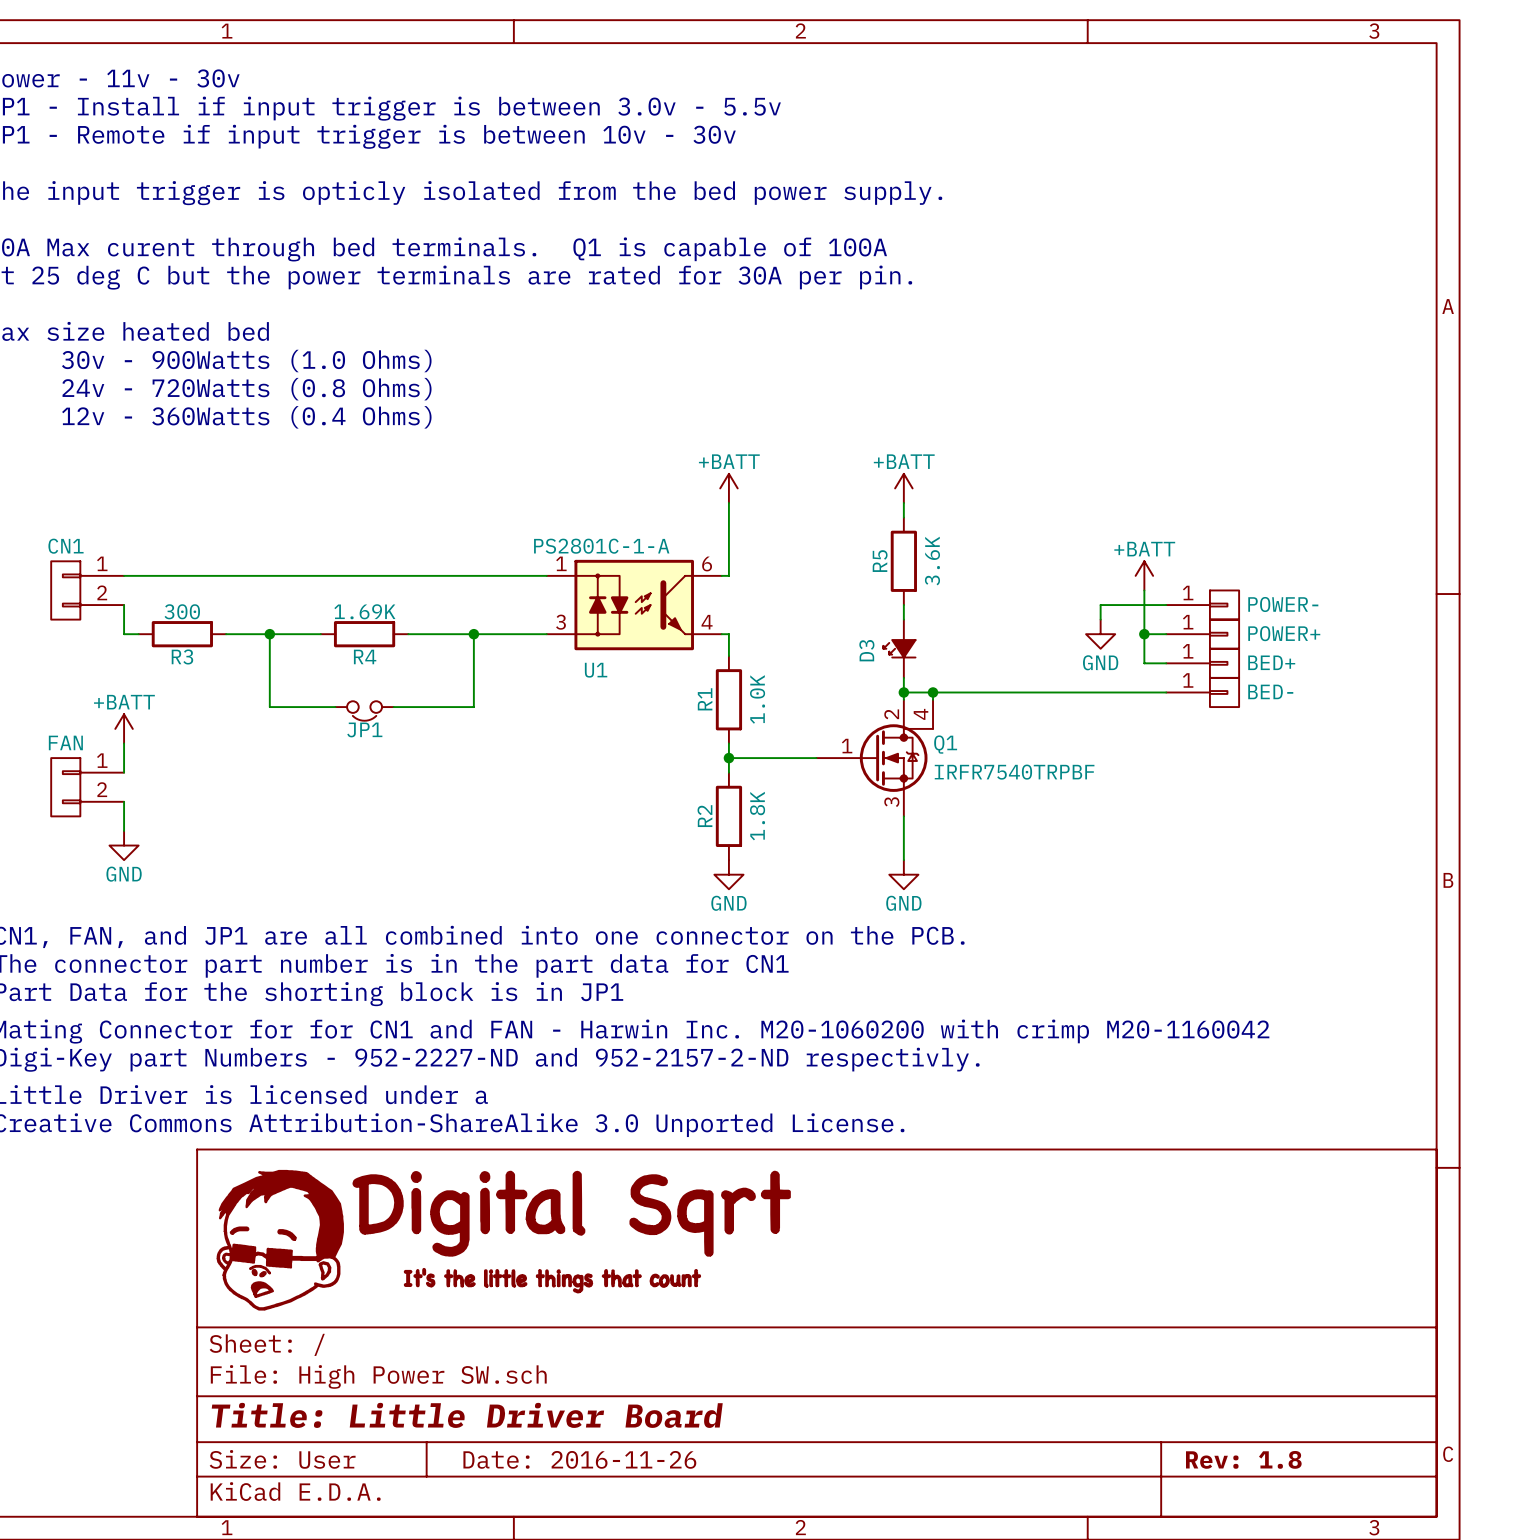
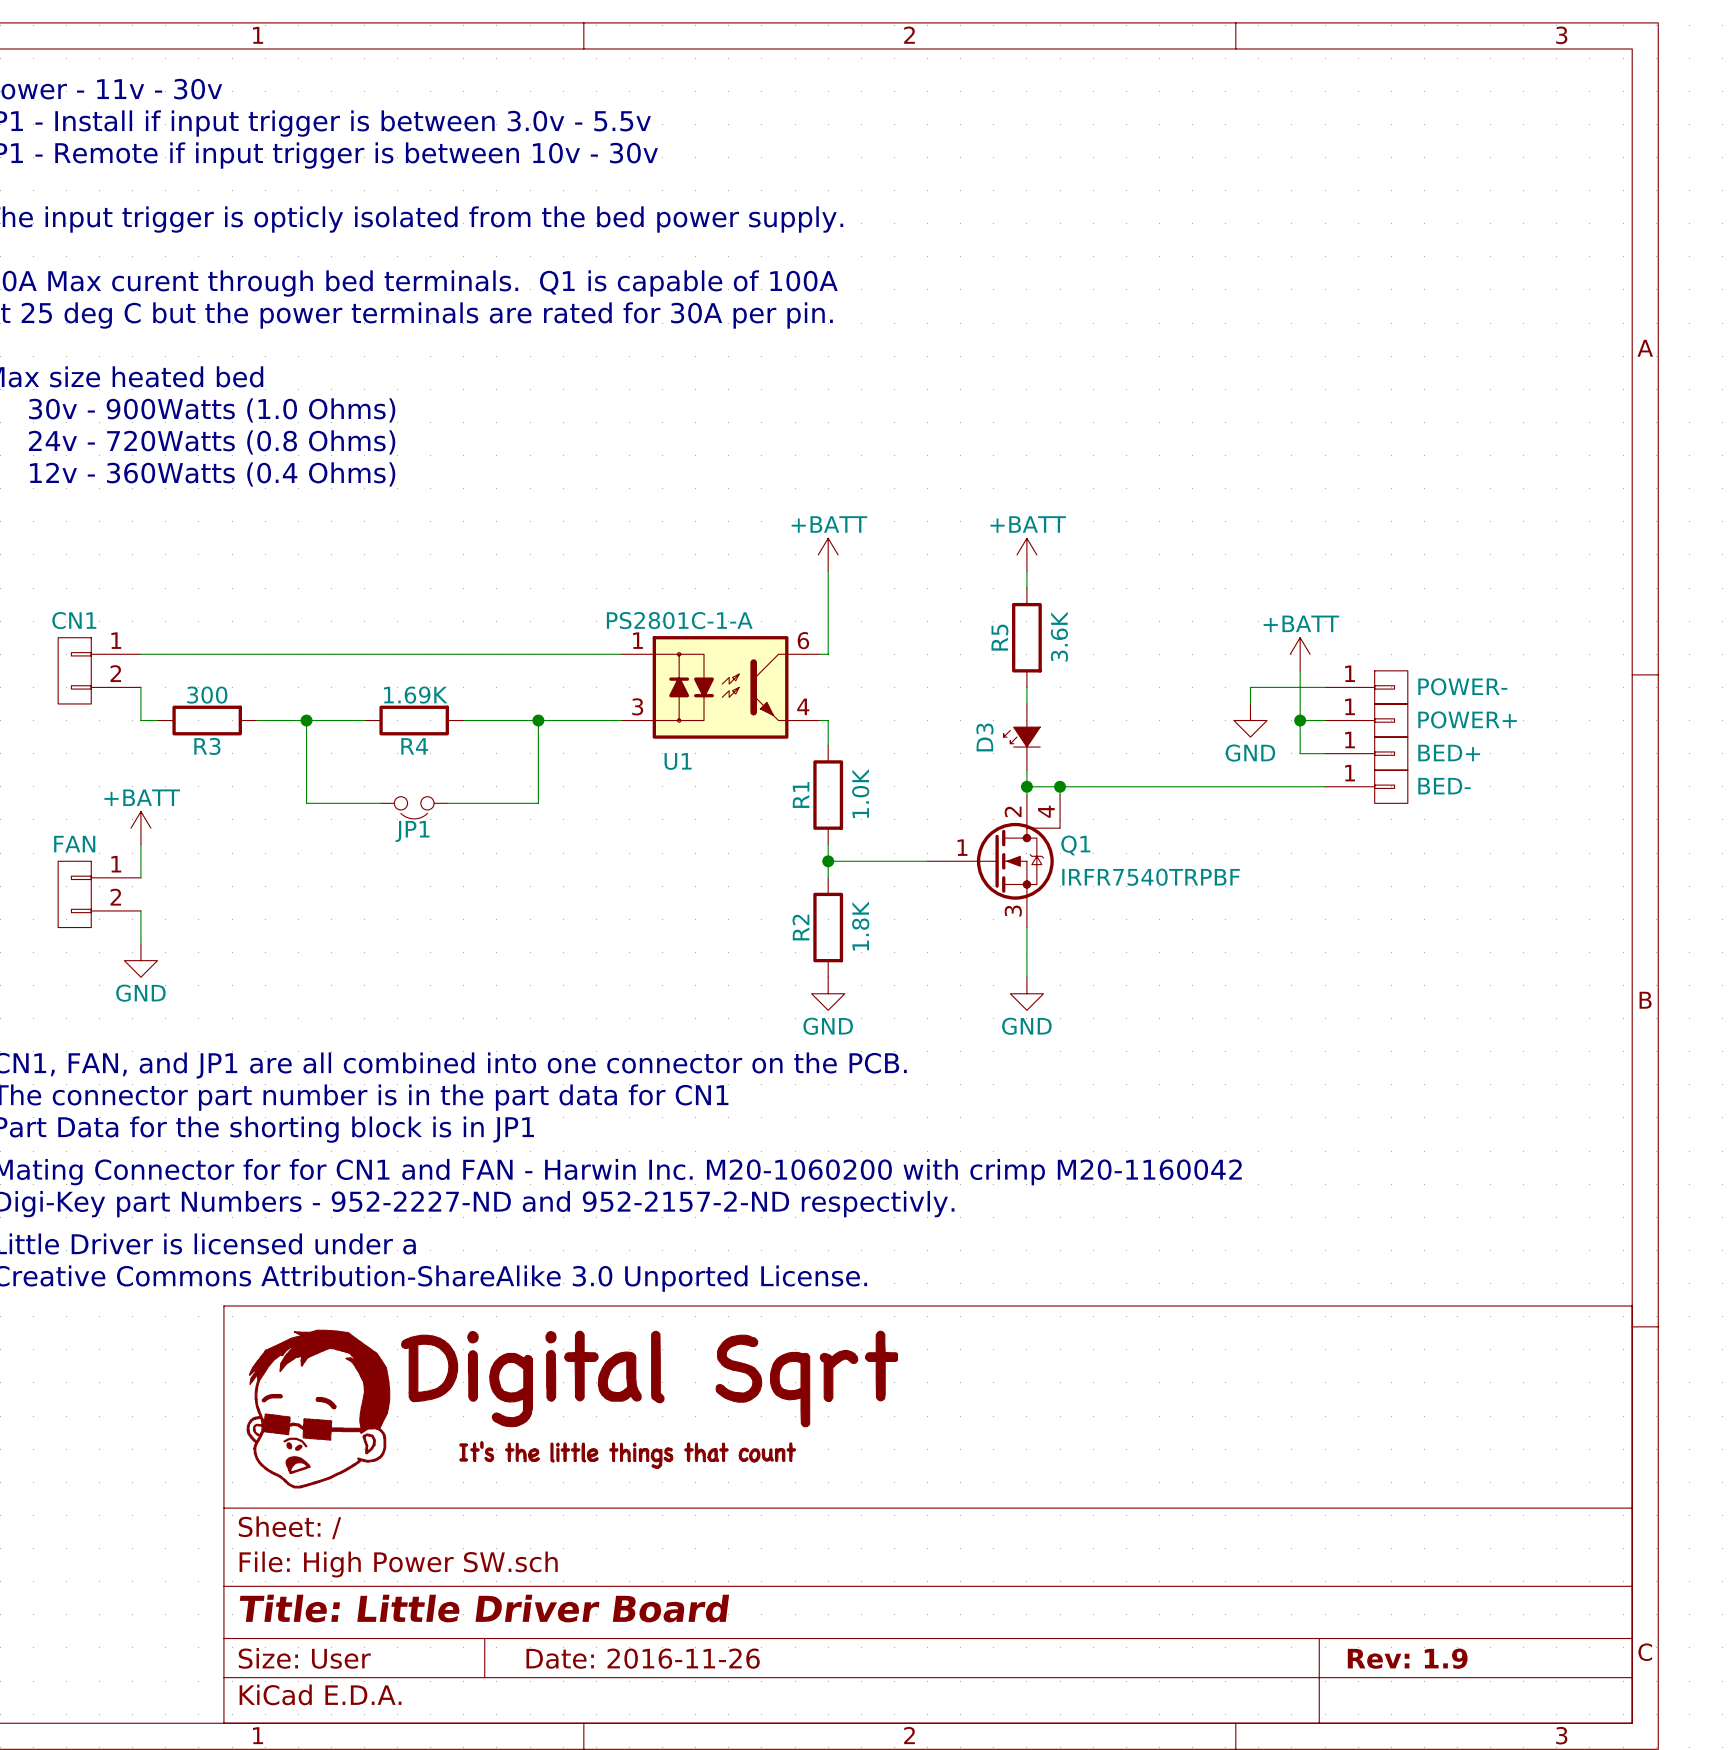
title block: Rev: 1.8 (1243, 1459) -> Rev: 1.9 (1407, 1658)

